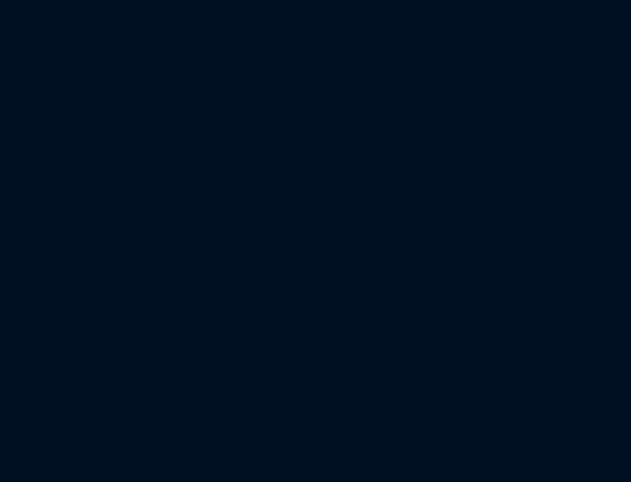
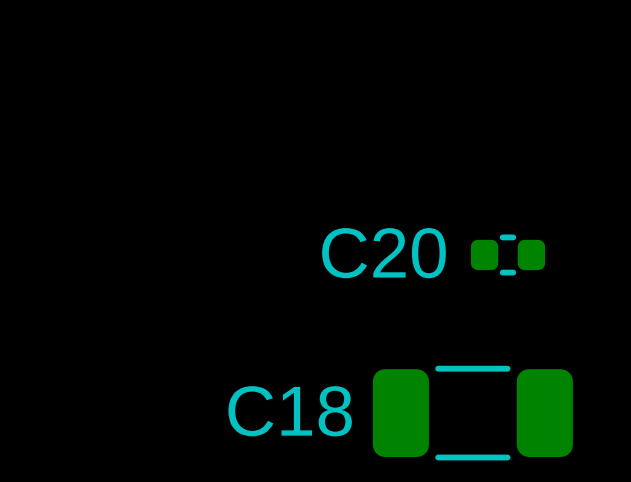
C20: none -> (507, 254)
C18: none -> (472, 413)

